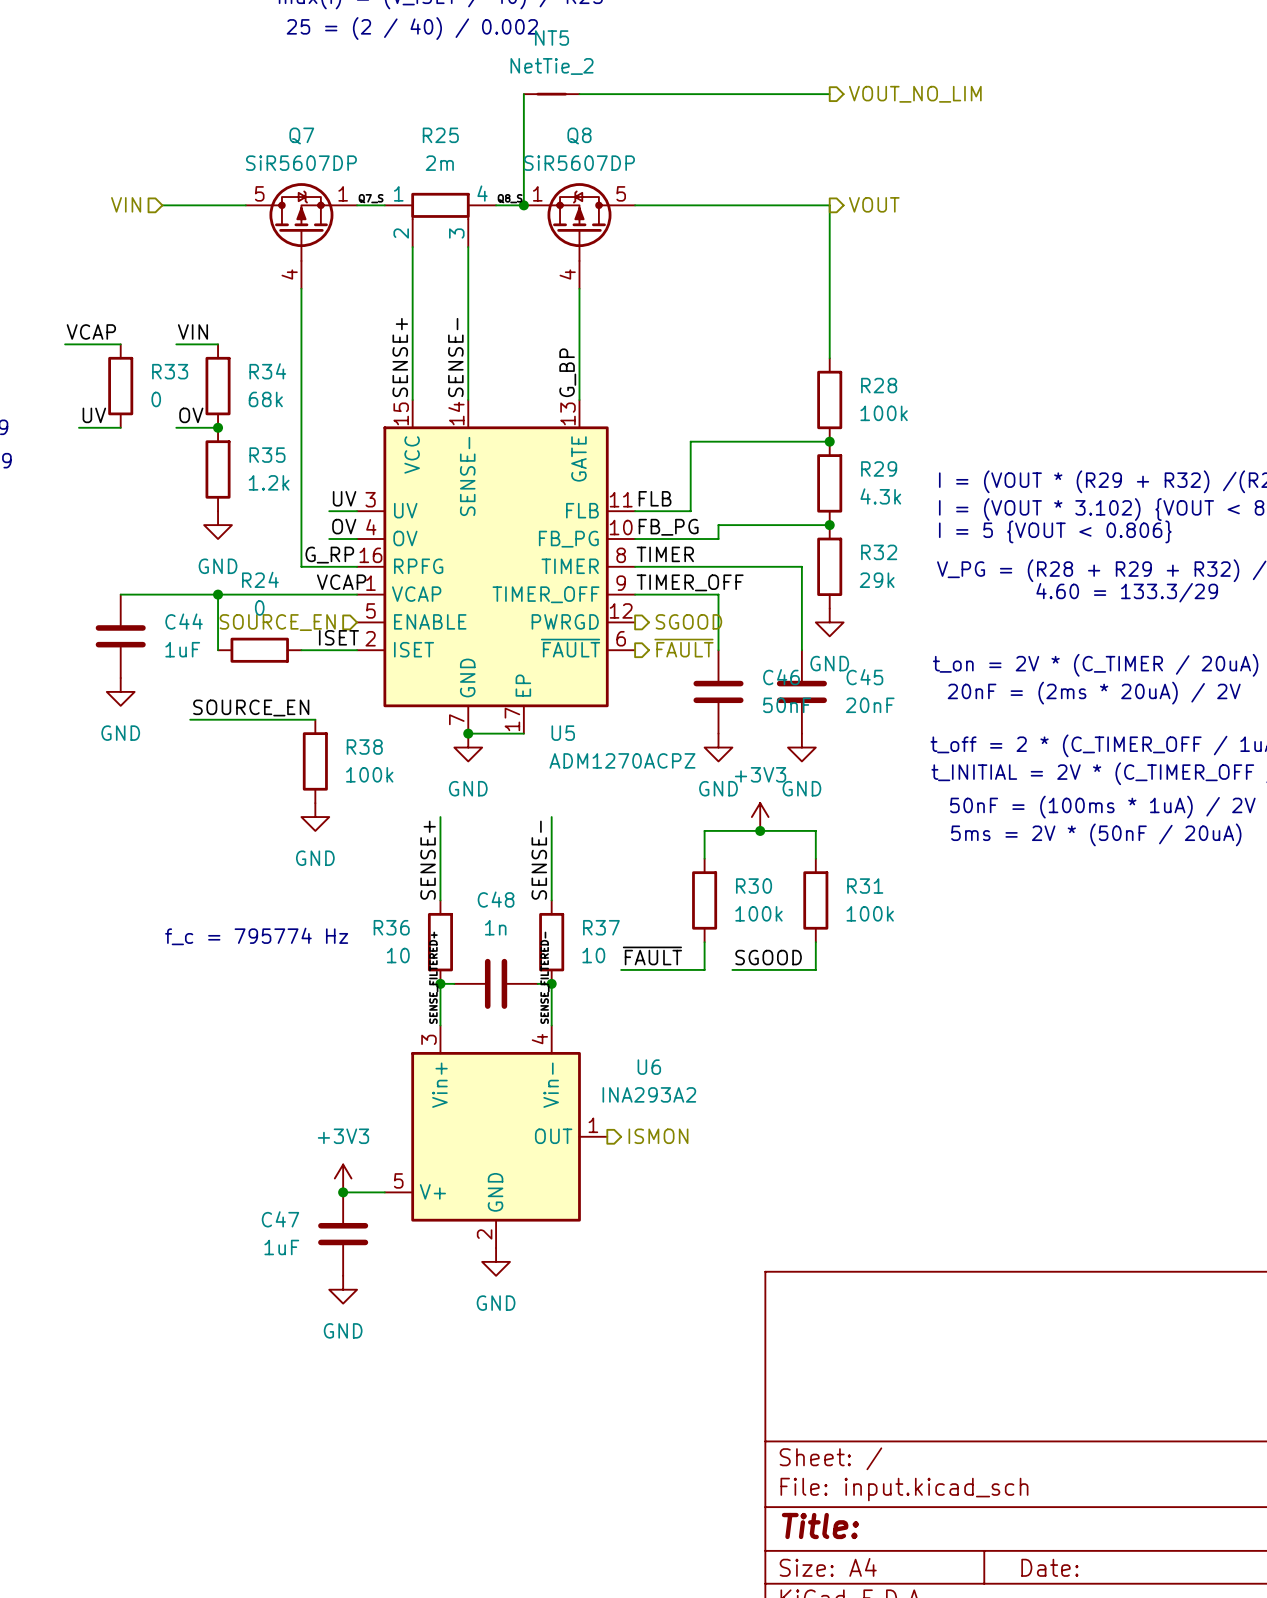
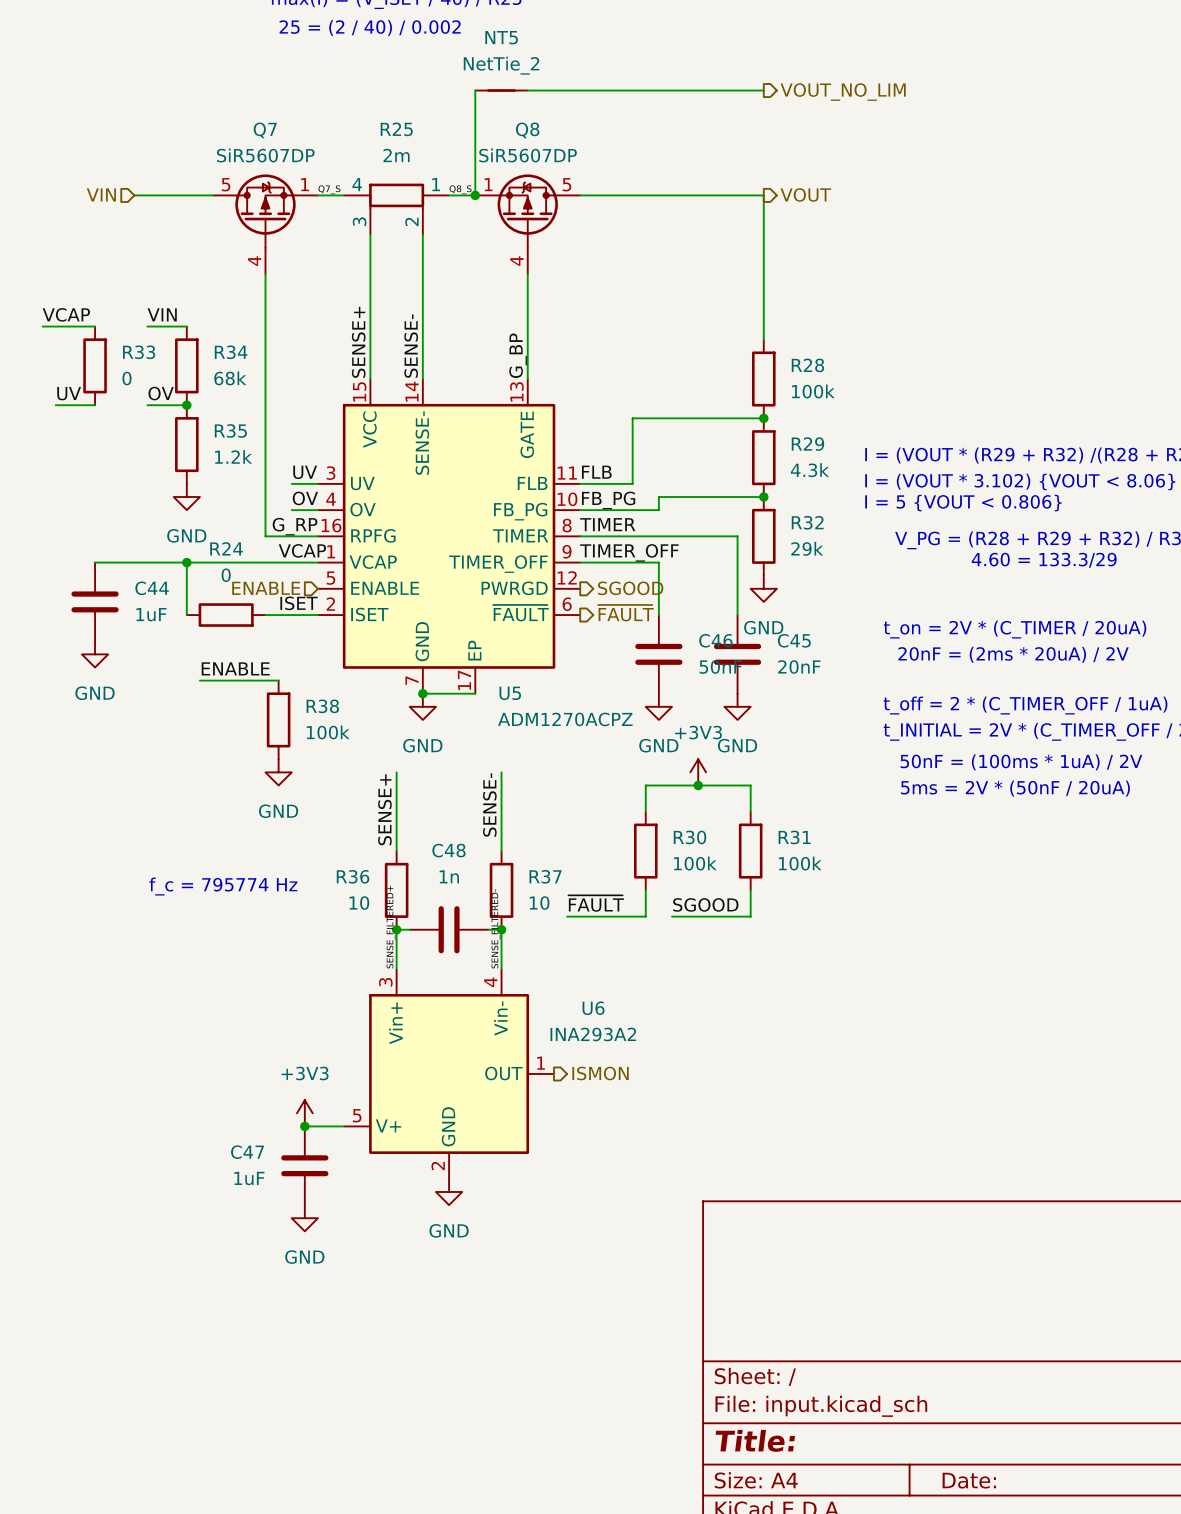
R25 flip: as is (440, 206) -> left-right (396, 196)
hierarchical label: SOURCE_EN (277, 622) -> ENABLE (266, 588)
label: SOURCE_EN (251, 707) -> none
label: none -> ENABLE (235, 668)
wire: (190, 719) (231, 719) -> none

